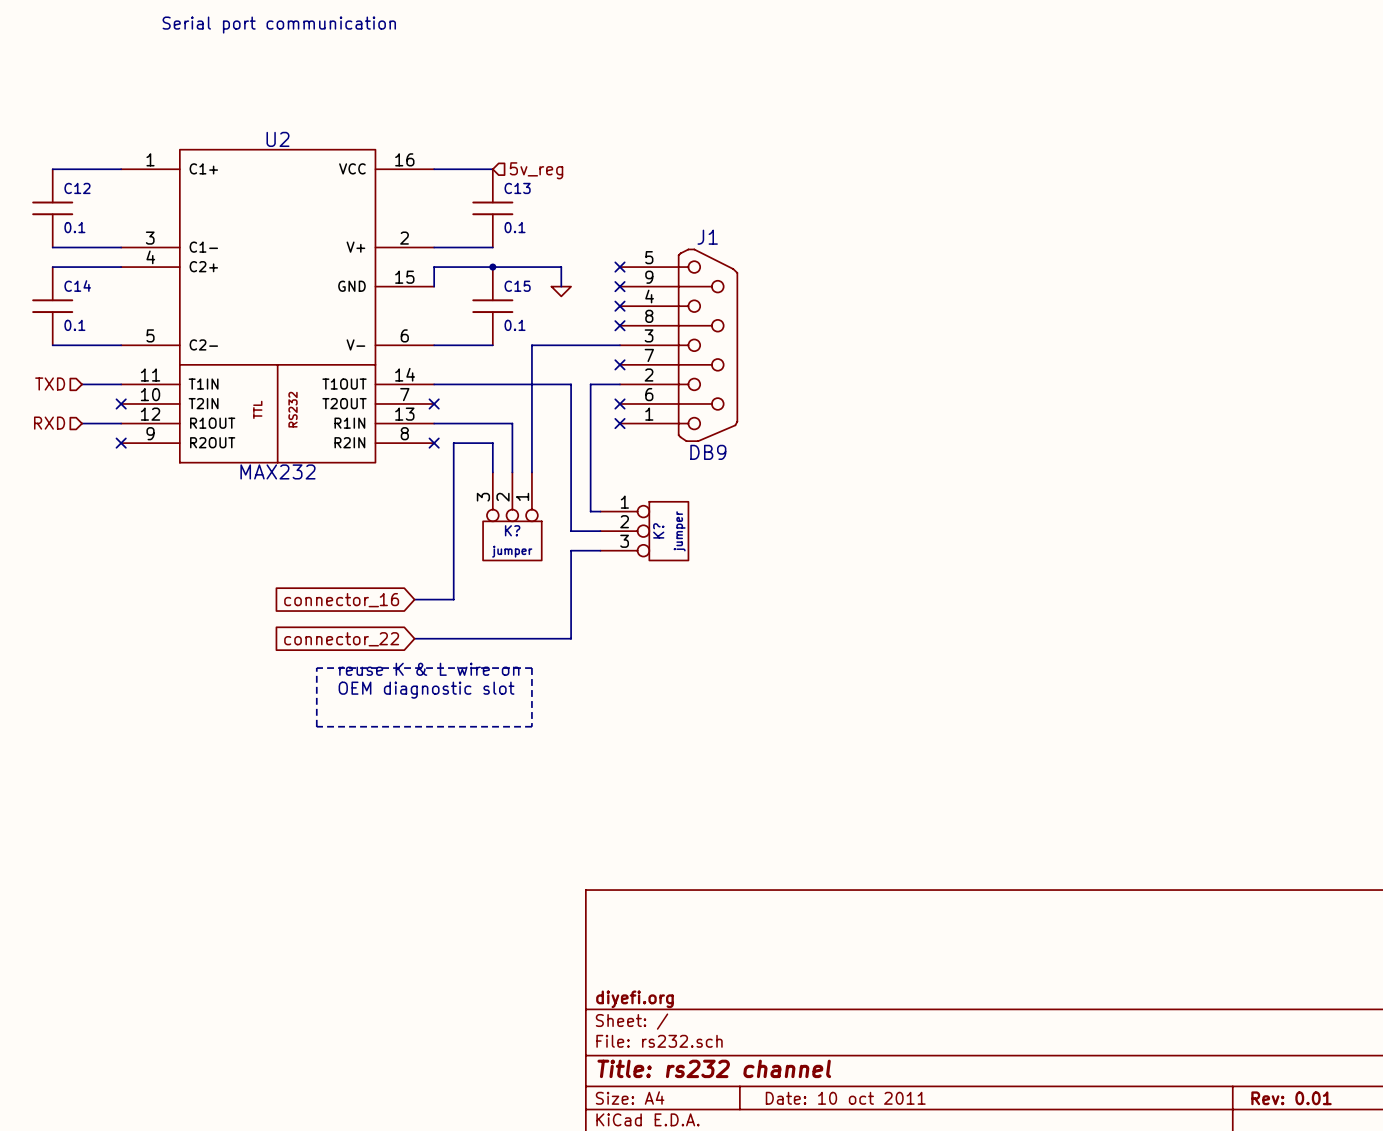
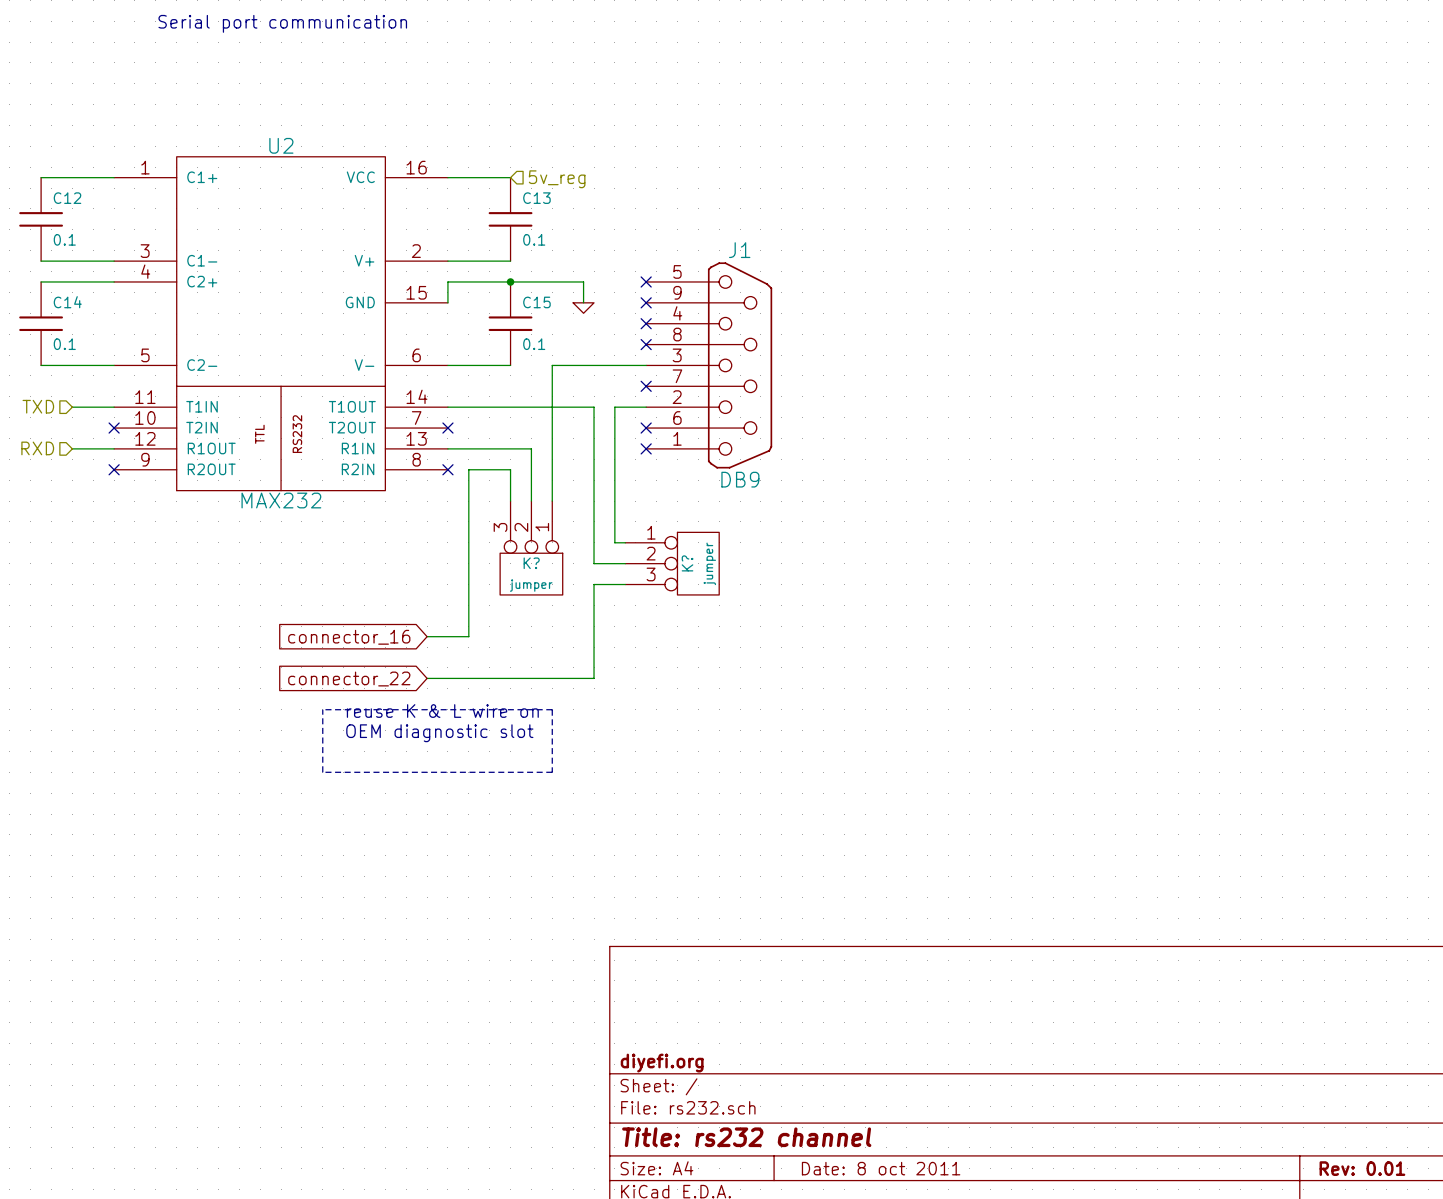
title block: Date: 10 oct 2011 (845, 1098) -> Date: 8 oct 2011 (881, 1168)

